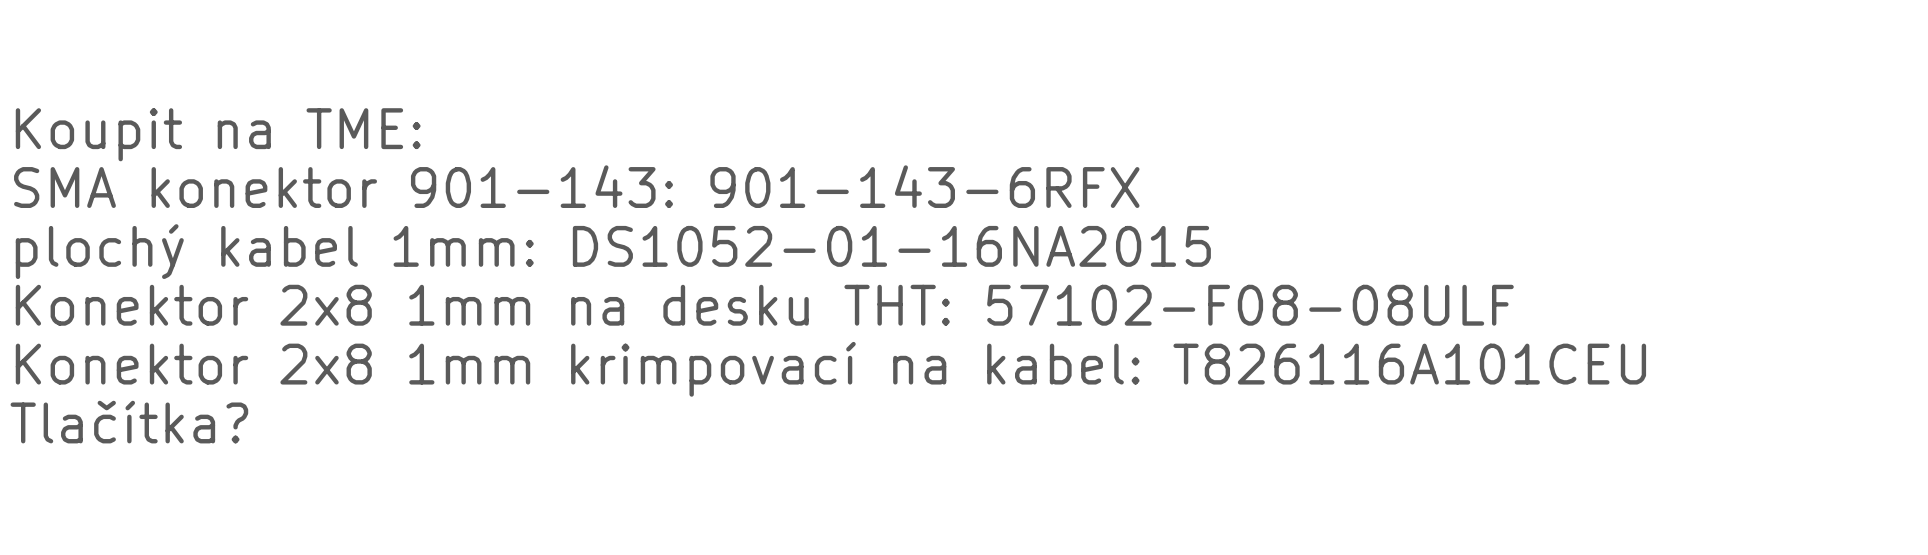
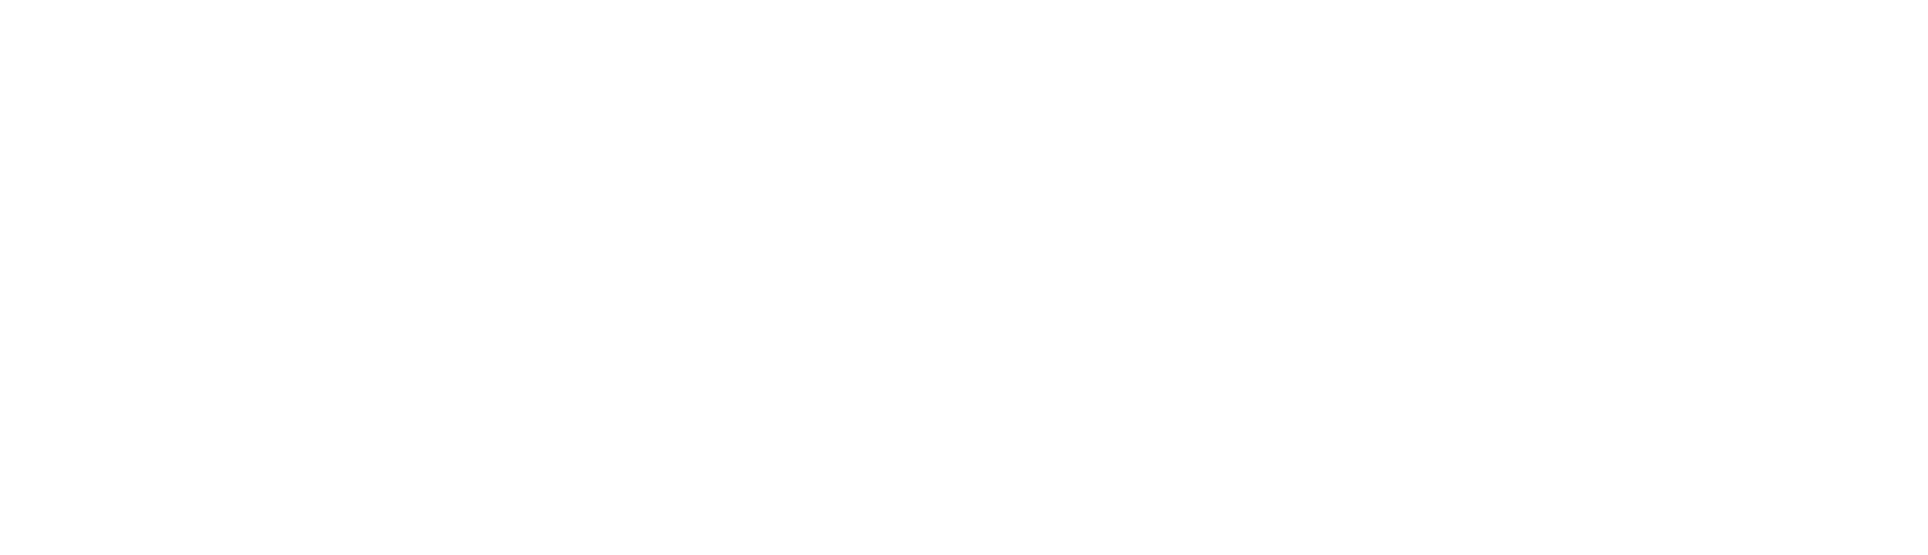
text: Koupit na TME: (218, 134) -> none
text: SMA konektor 901-143: 901-143-6RFX (576, 186) -> none
text: plochý kabel 1mm: DS1052-01-16NA2015 (613, 251) -> none
text: Konektor 2x8 1mm na desku THT: 57102-F08-08ULF (764, 305) -> none
text: Konektor 2x8 1mm krimpovací na kabel: T826116A101CEU (830, 369) -> none
text: Tlačítka? (129, 422) -> none

